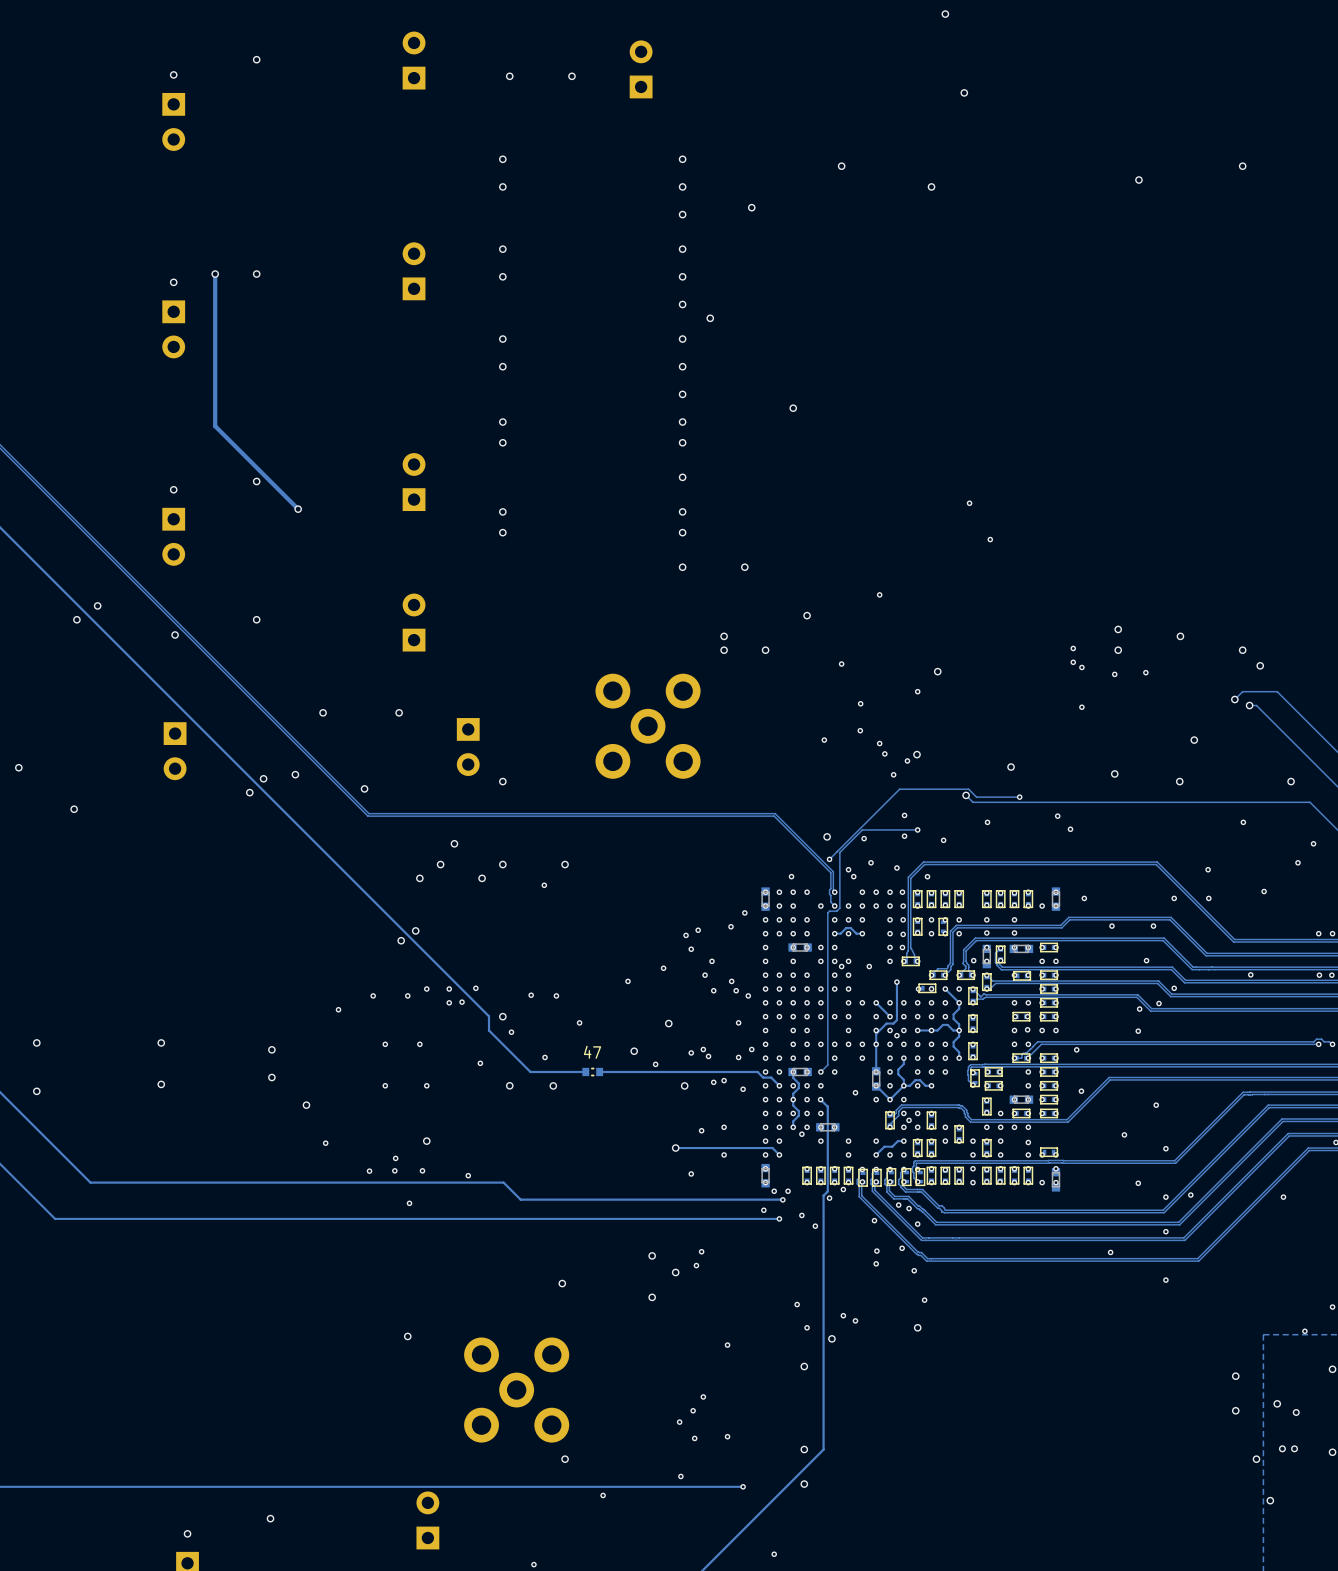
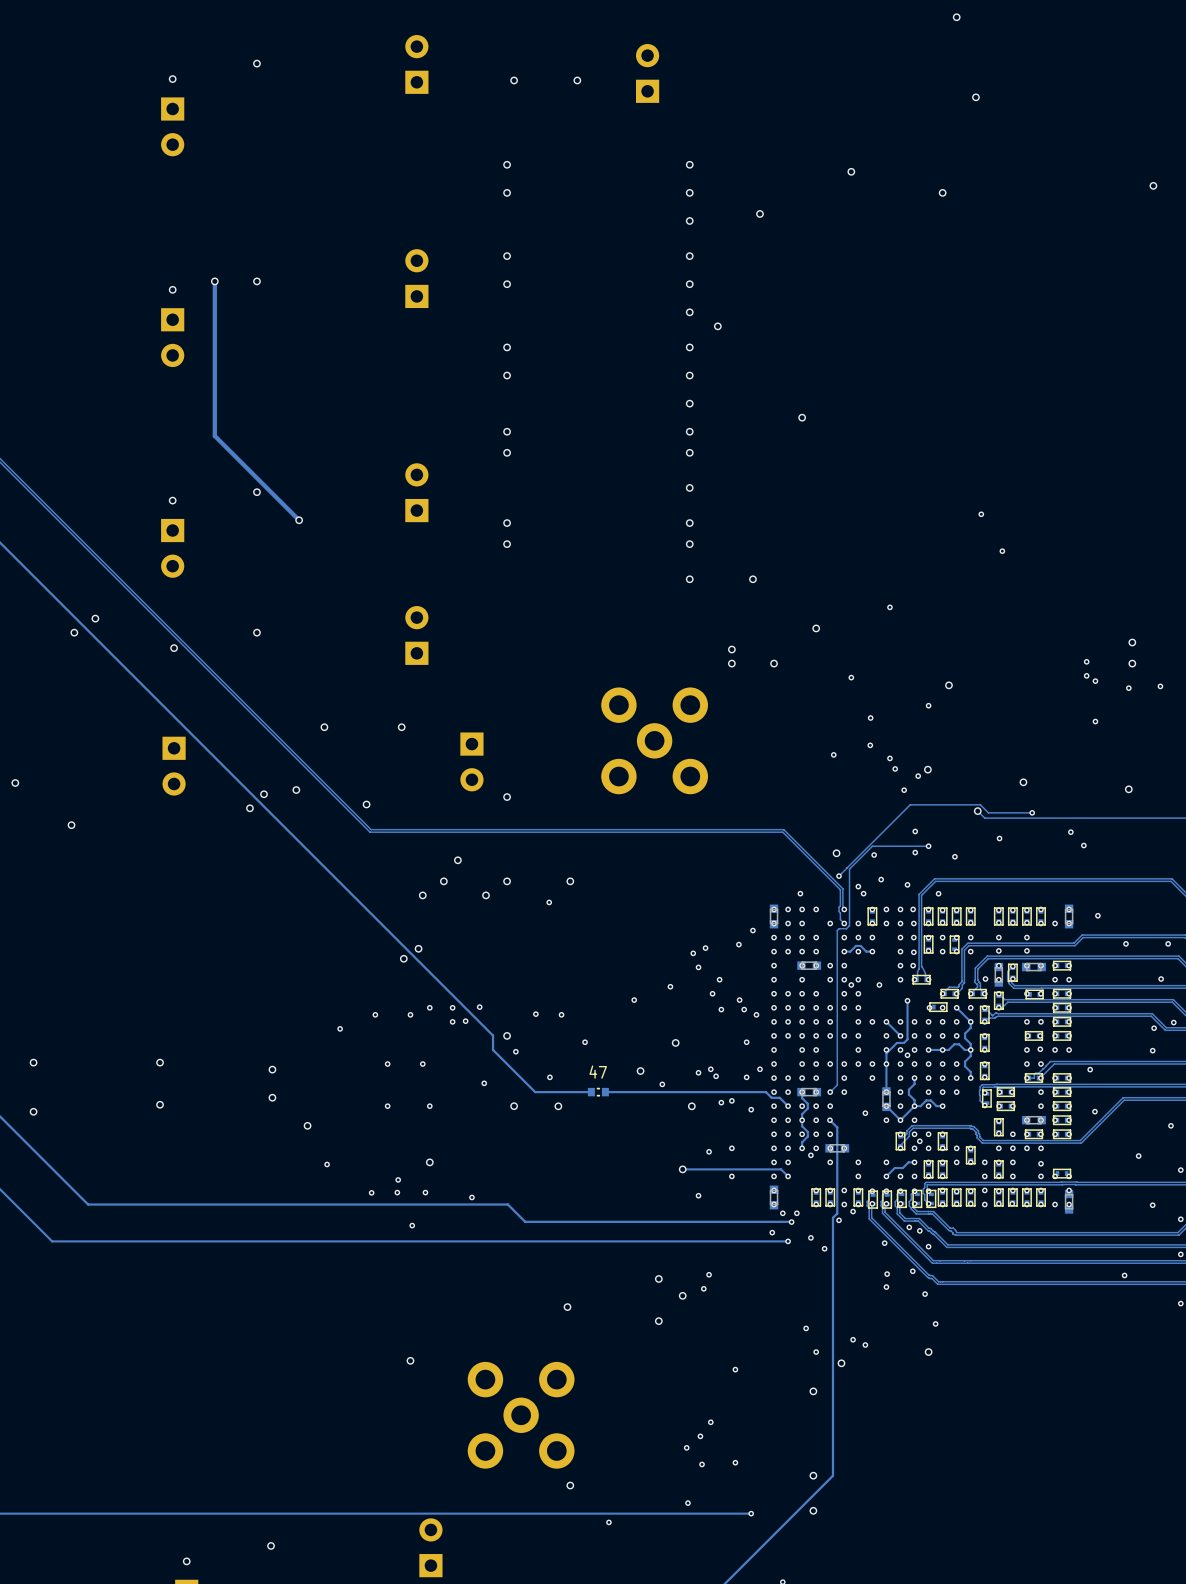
part position: (834, 1175) -> (872, 916)

